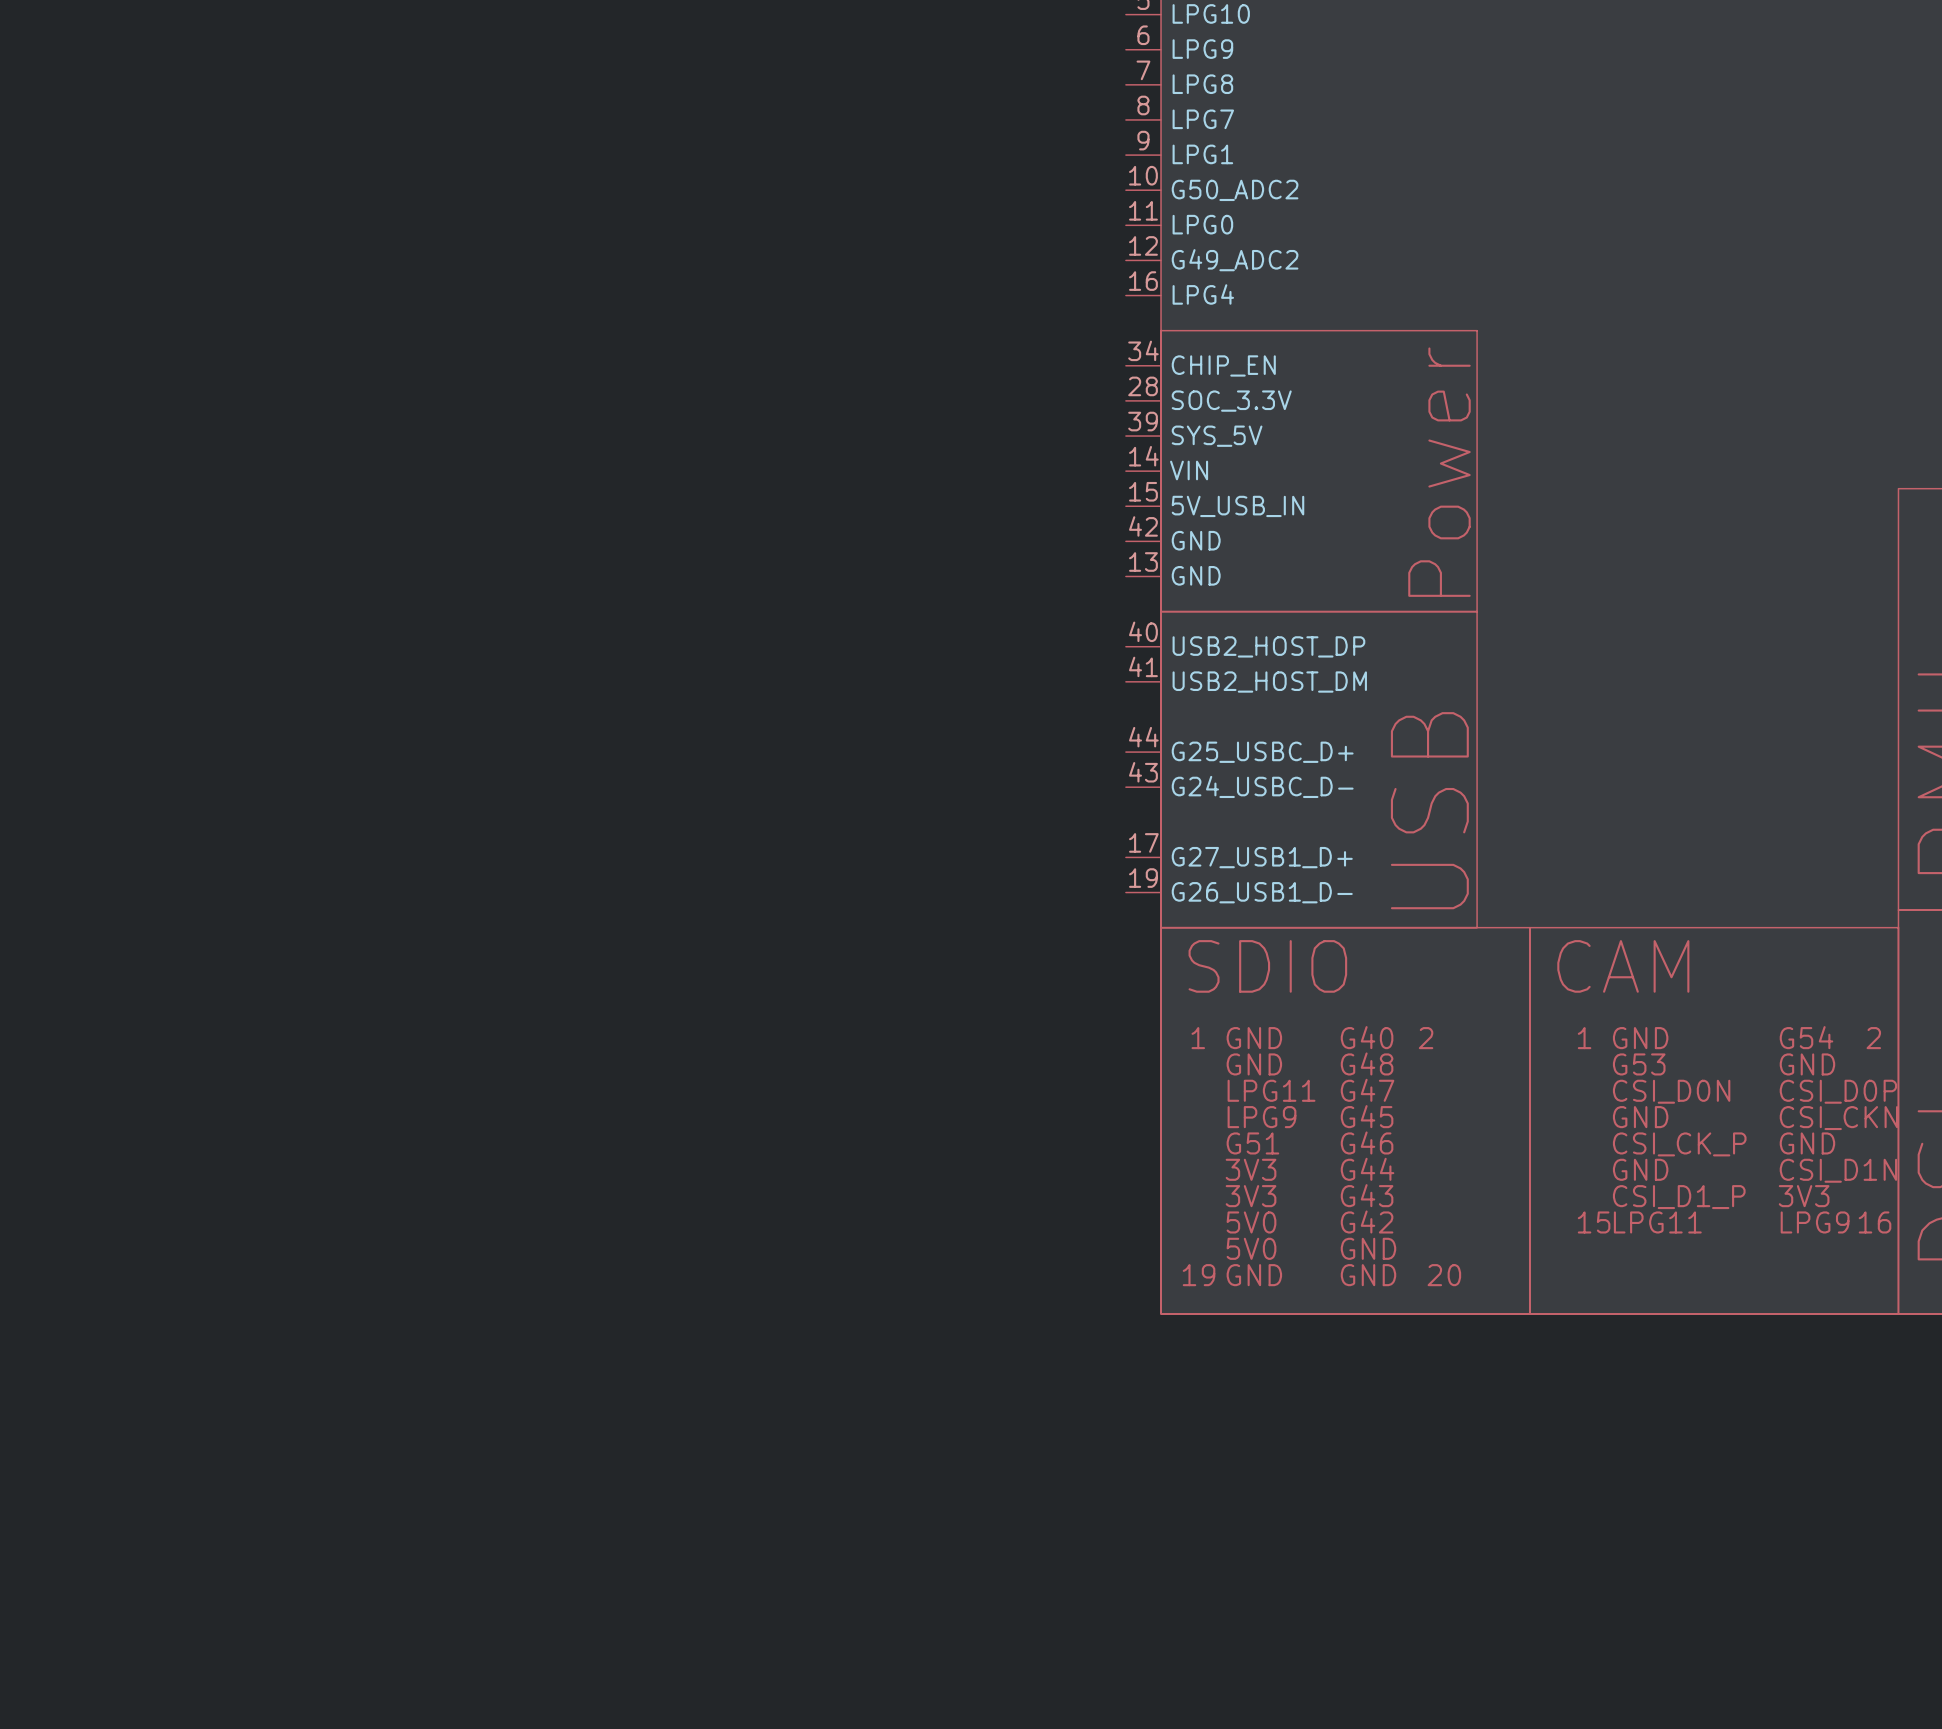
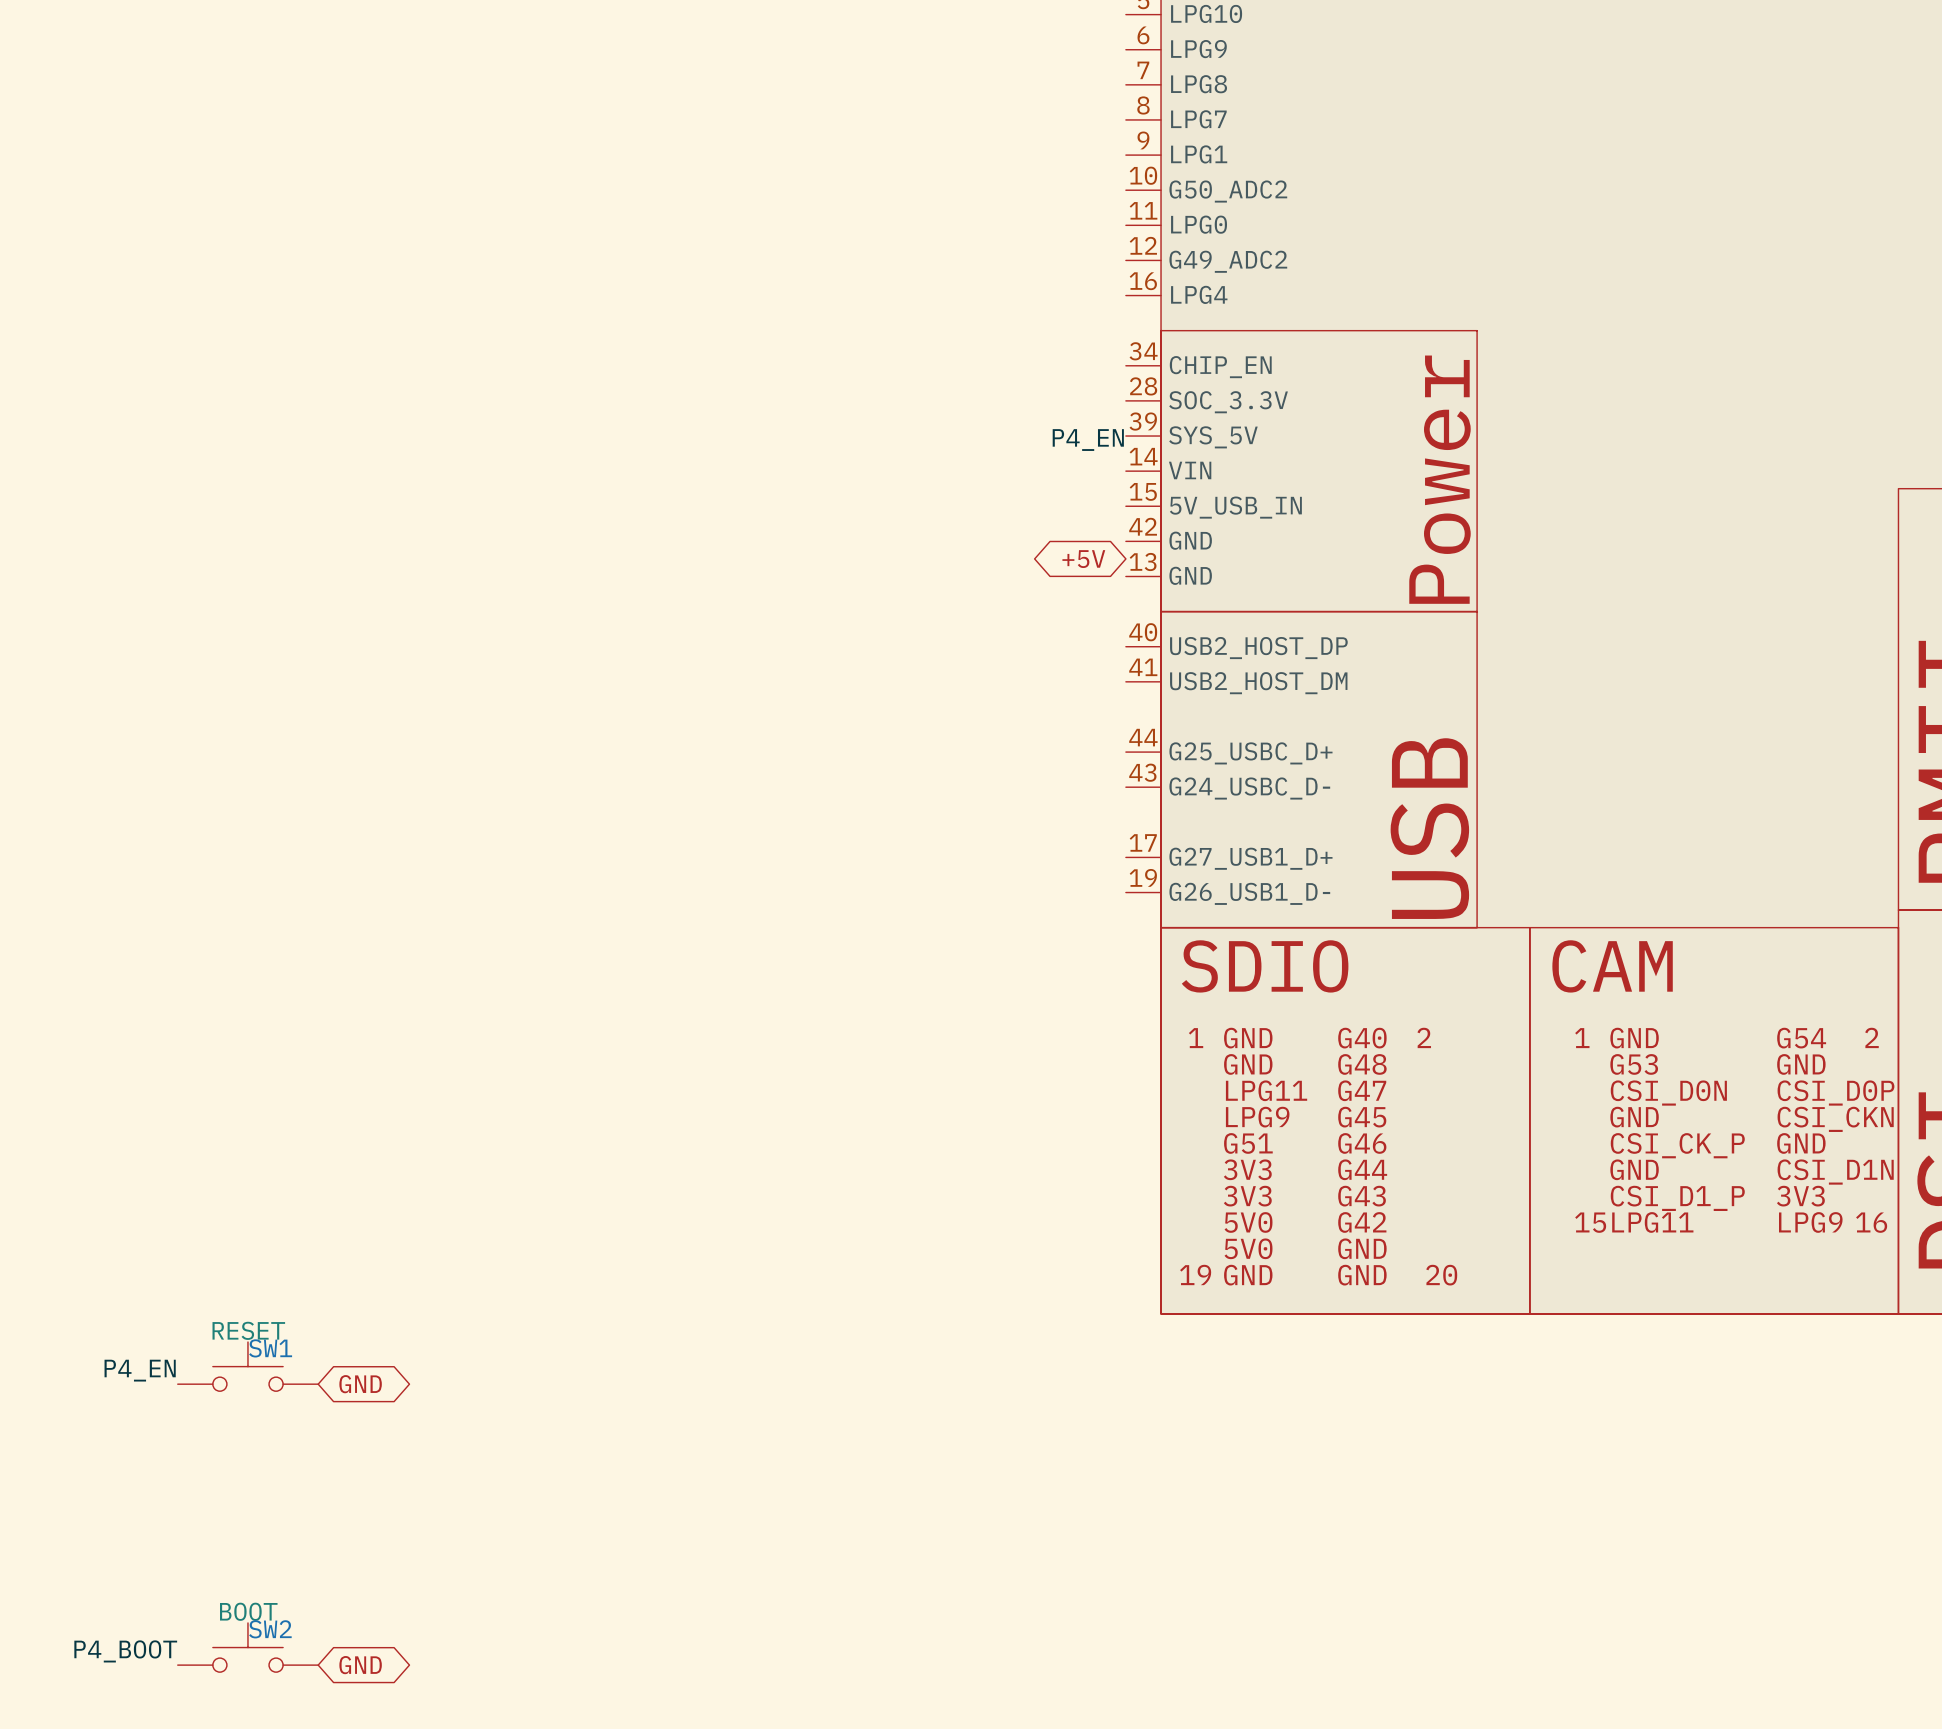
label: none -> P4_EN (1088, 440)
global label: none -> +5V (1083, 559)
SW1: none -> RESET (247, 1366)
label: none -> P4_EN (140, 1370)
global label: none -> GND (360, 1384)
SW2: none -> BOOT (247, 1647)
label: none -> P4_BOOT (125, 1651)
global label: none -> GND (360, 1665)

